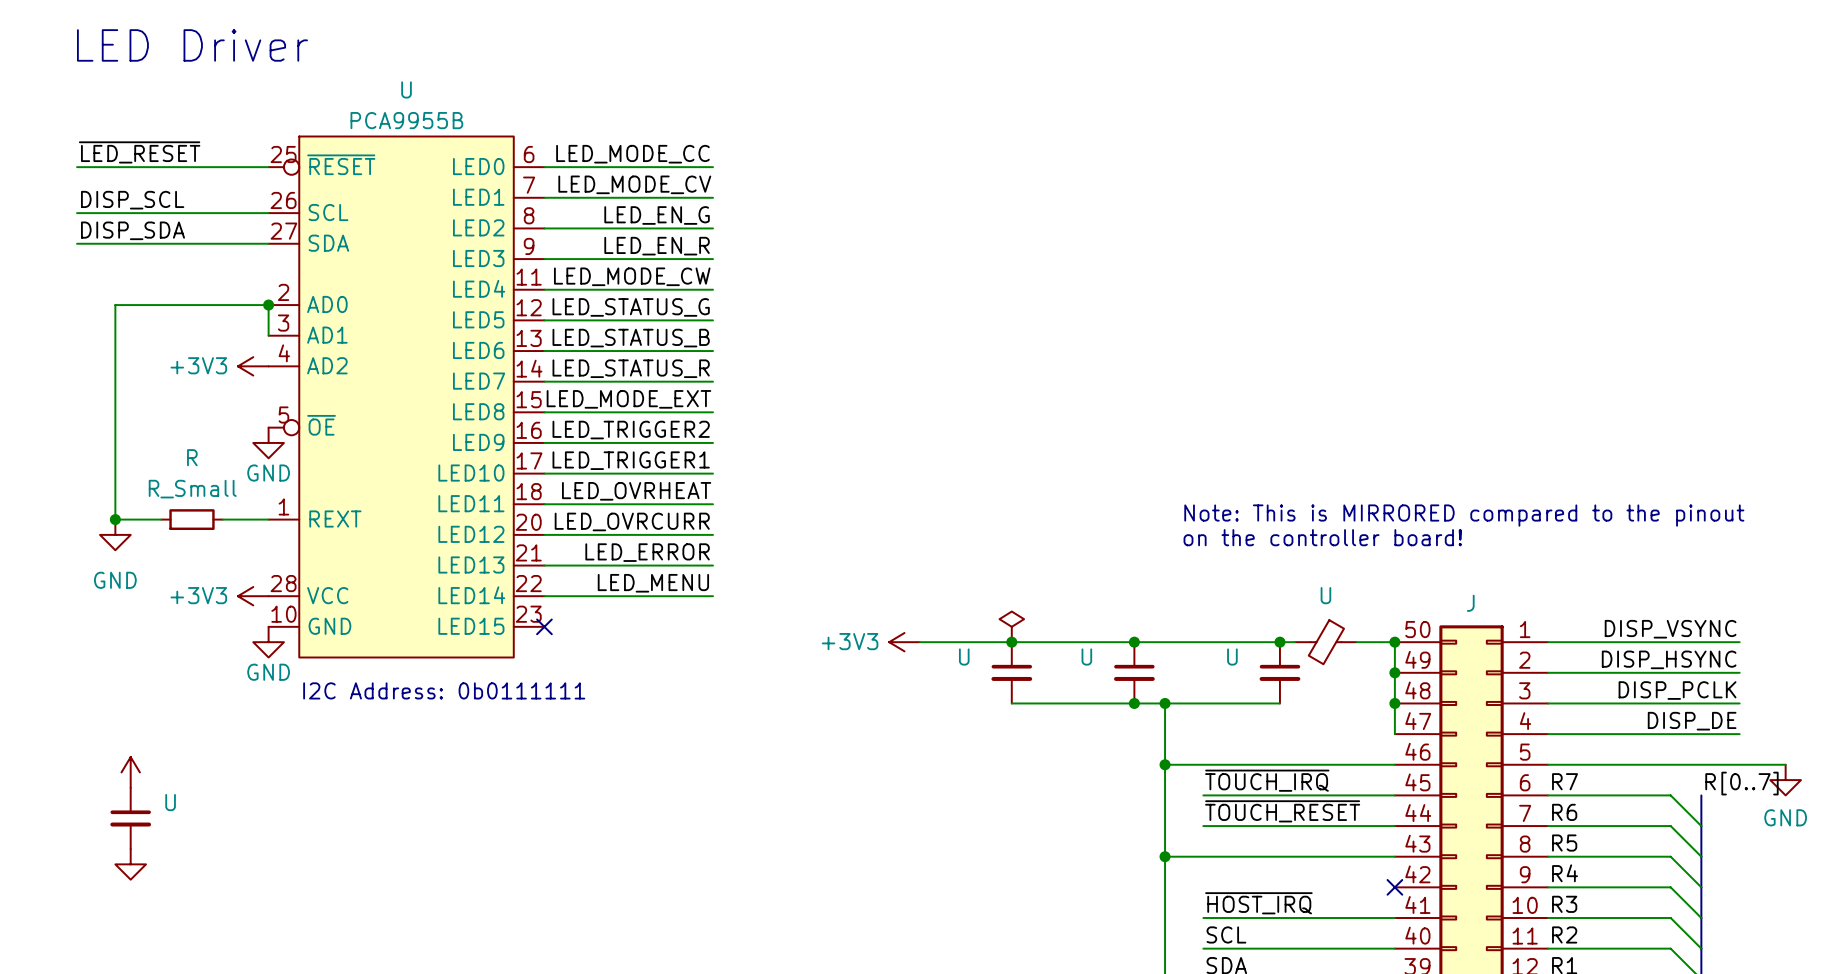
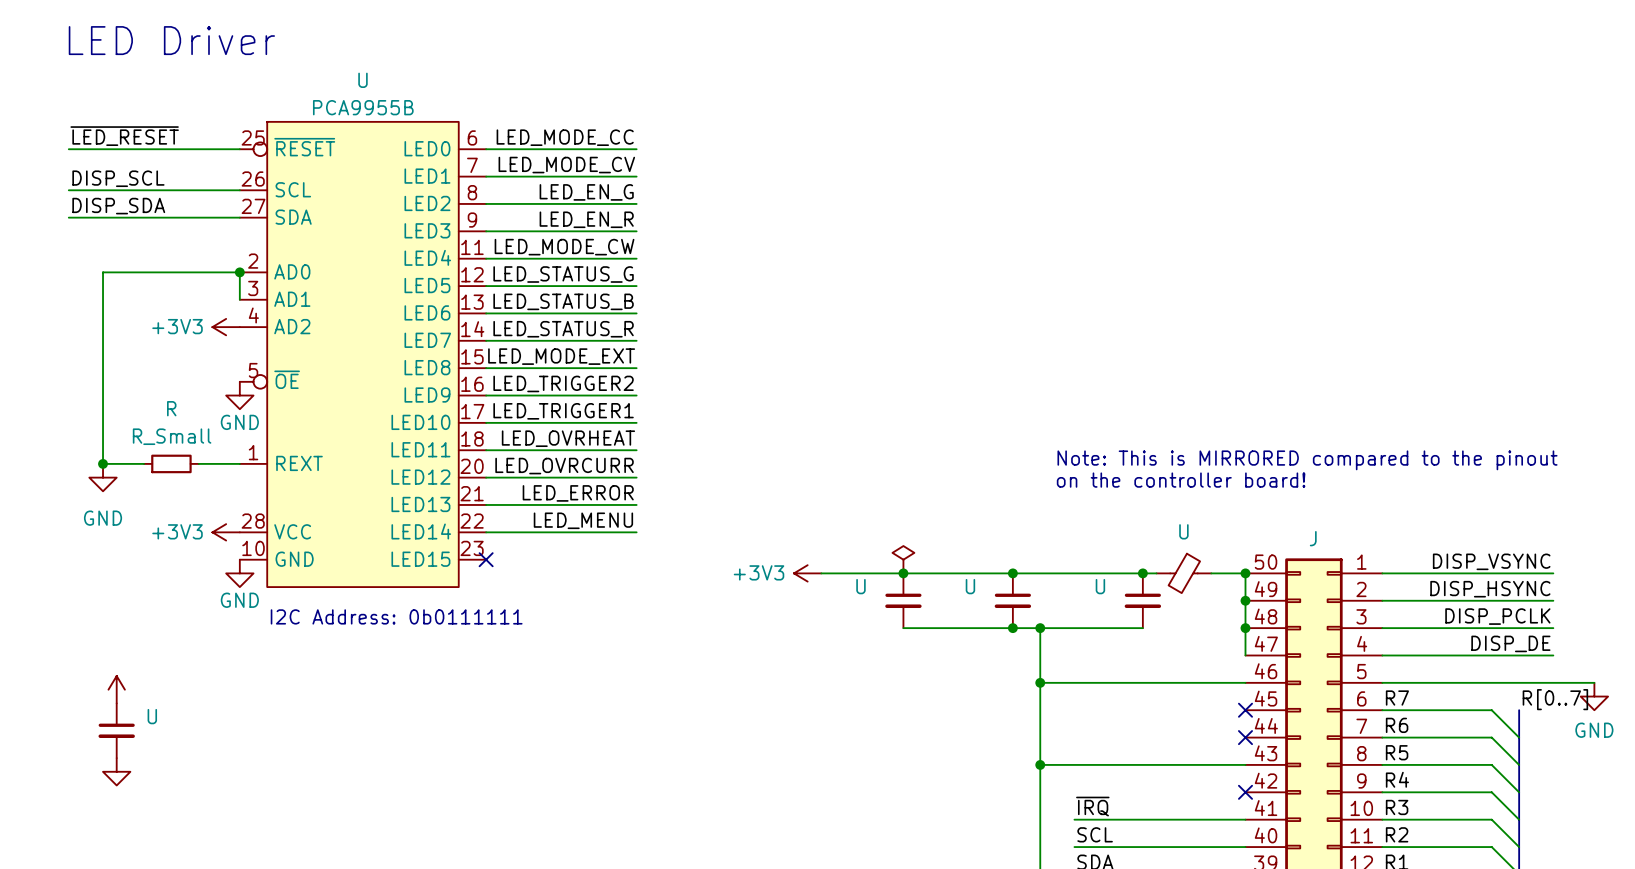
label: ~{TOUCH_IRQ} (1267, 780) -> none
wire: (1203, 795) (1394, 795) -> none
no-connect mark: none -> (1245, 710)
label: ~{TOUCH_RESET} (1282, 811) -> none
wire: (1203, 826) (1394, 826) -> none
no-connect mark: none -> (1245, 737)
label: ~{HOST_IRQ} (1258, 903) -> ~{IRQ} (1092, 806)

